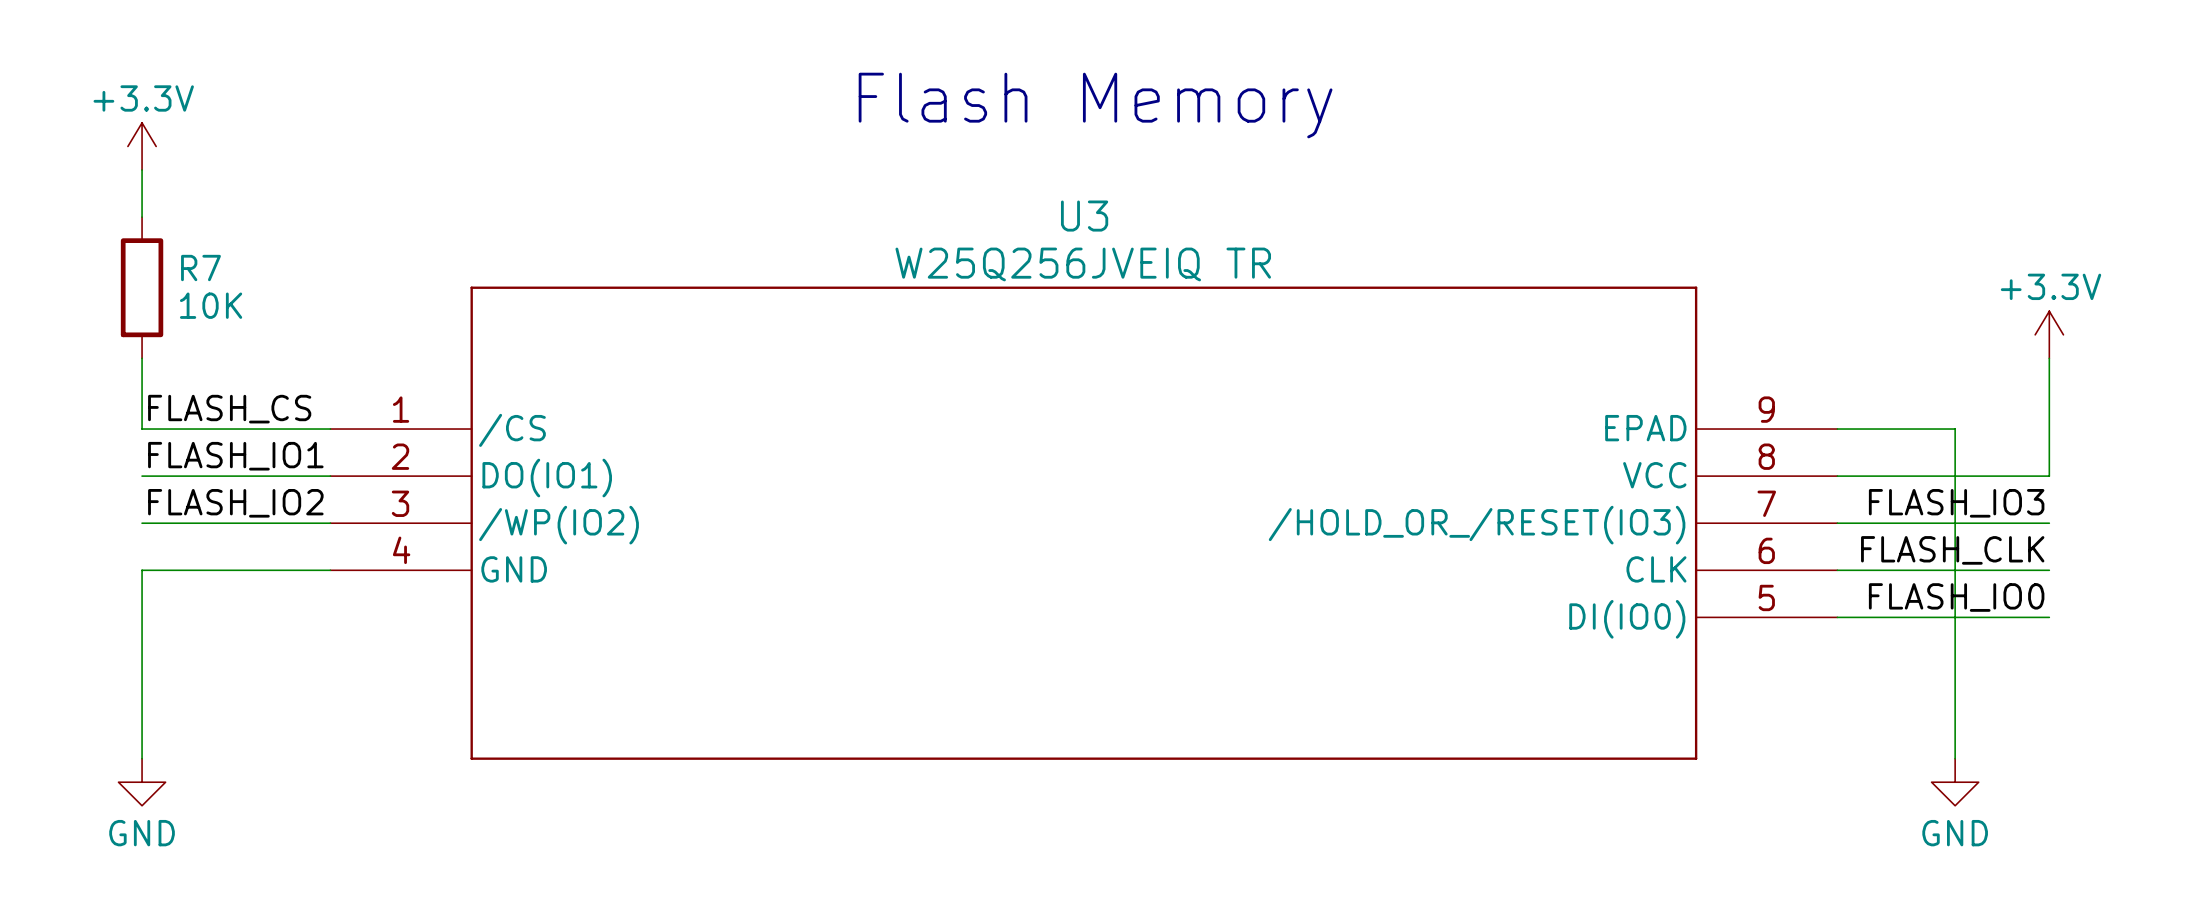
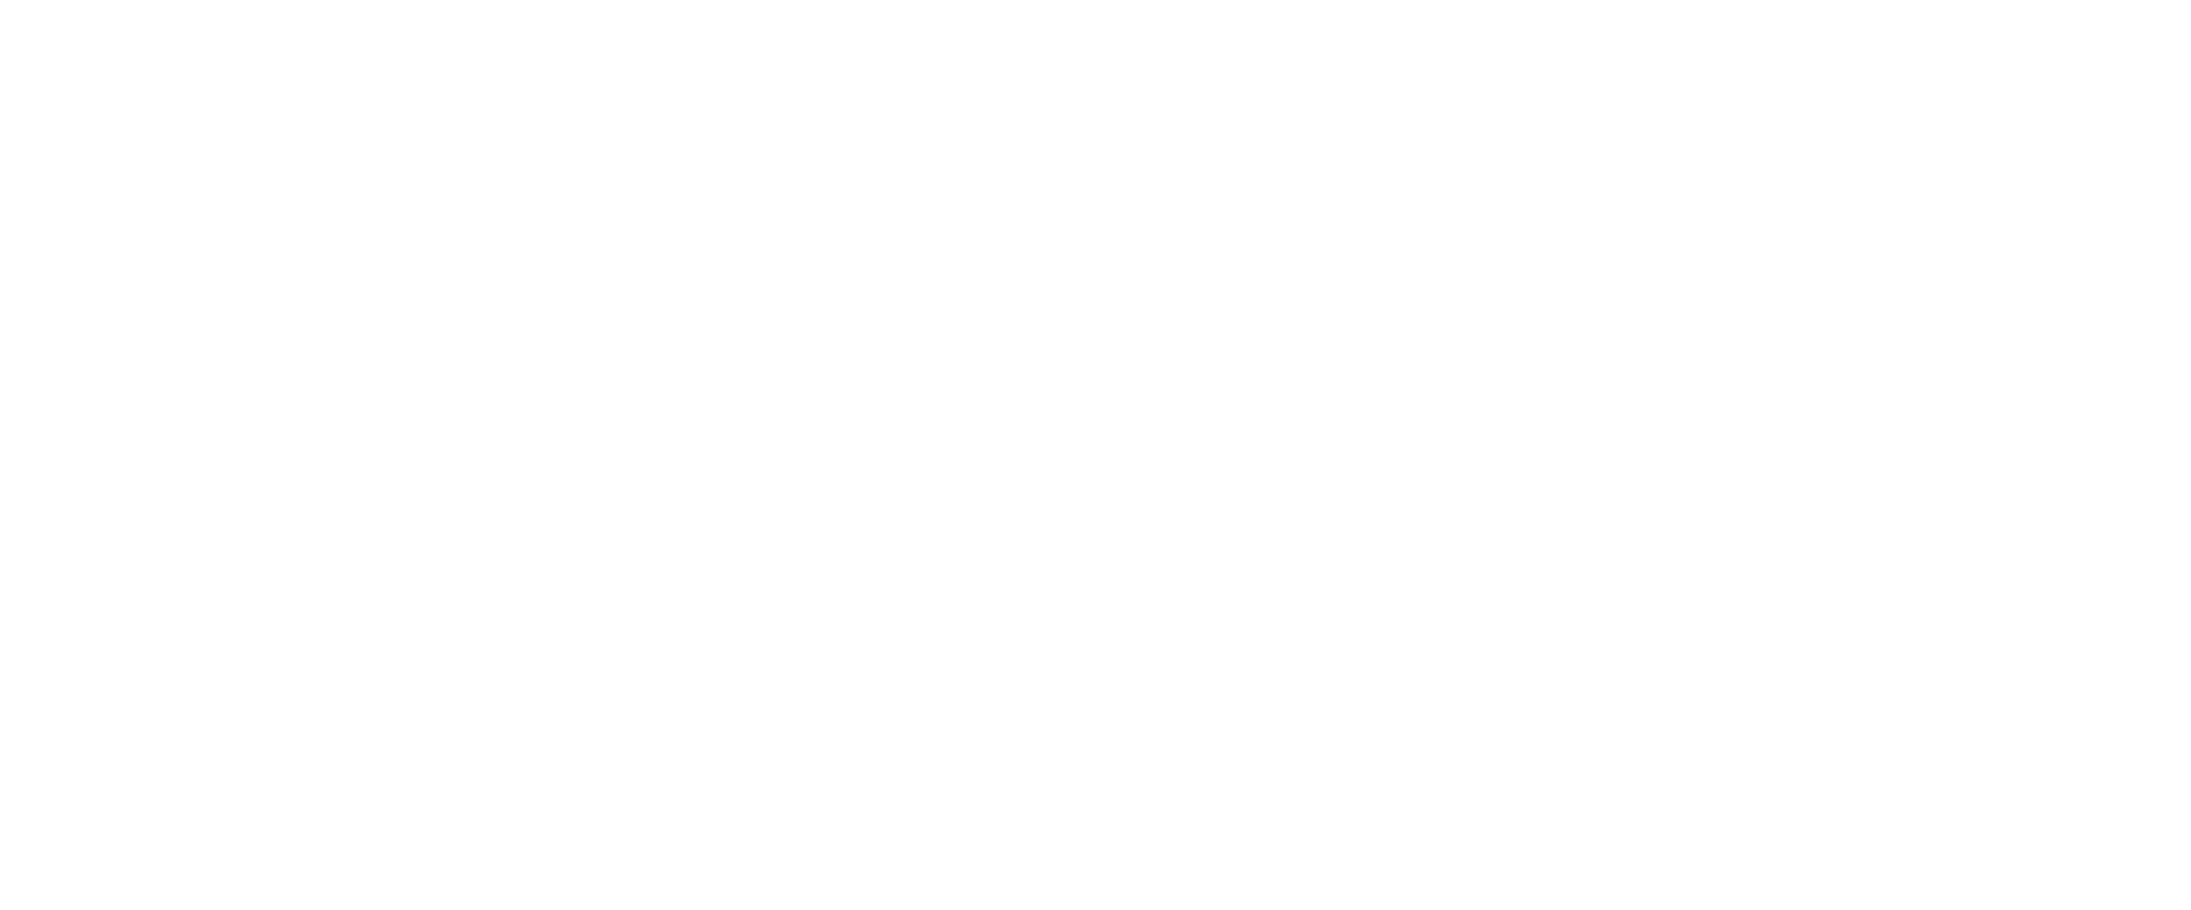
text: Flash Memory (1095, 105) -> none
power symbol: +3.3V (142, 146) -> none
wire: (142, 170) (142, 217) -> none
R7: 10K (142, 287) -> none
power symbol: +3.3V (2049, 334) -> none
wire: (142, 358) (142, 429) (330, 429) -> none
wire: (2049, 358) (2049, 476) (1837, 476) -> none
label: FLASH_CS (229, 409) -> none
wire: (1837, 429) (1955, 429) (1955, 758) -> none
label: FLASH_IO1 (235, 456) -> none
wire: (142, 476) (330, 476) -> none
label: FLASH_IO2 (235, 503) -> none
label: FLASH_IO3 (1956, 503) -> none
wire: (142, 523) (330, 523) -> none
U3: W25Q256JVEIQ TR (1083, 523) -> none
wire: (1837, 523) (2049, 523) -> none
label: FLASH_CLK (1952, 550) -> none
wire: (330, 570) (142, 570) (142, 758) -> none
wire: (1837, 570) (2049, 570) -> none
label: FLASH_IO0 (1956, 597) -> none
wire: (1837, 617) (2049, 617) -> none
power symbol: GND (142, 782) -> none
power symbol: GND (1955, 782) -> none

